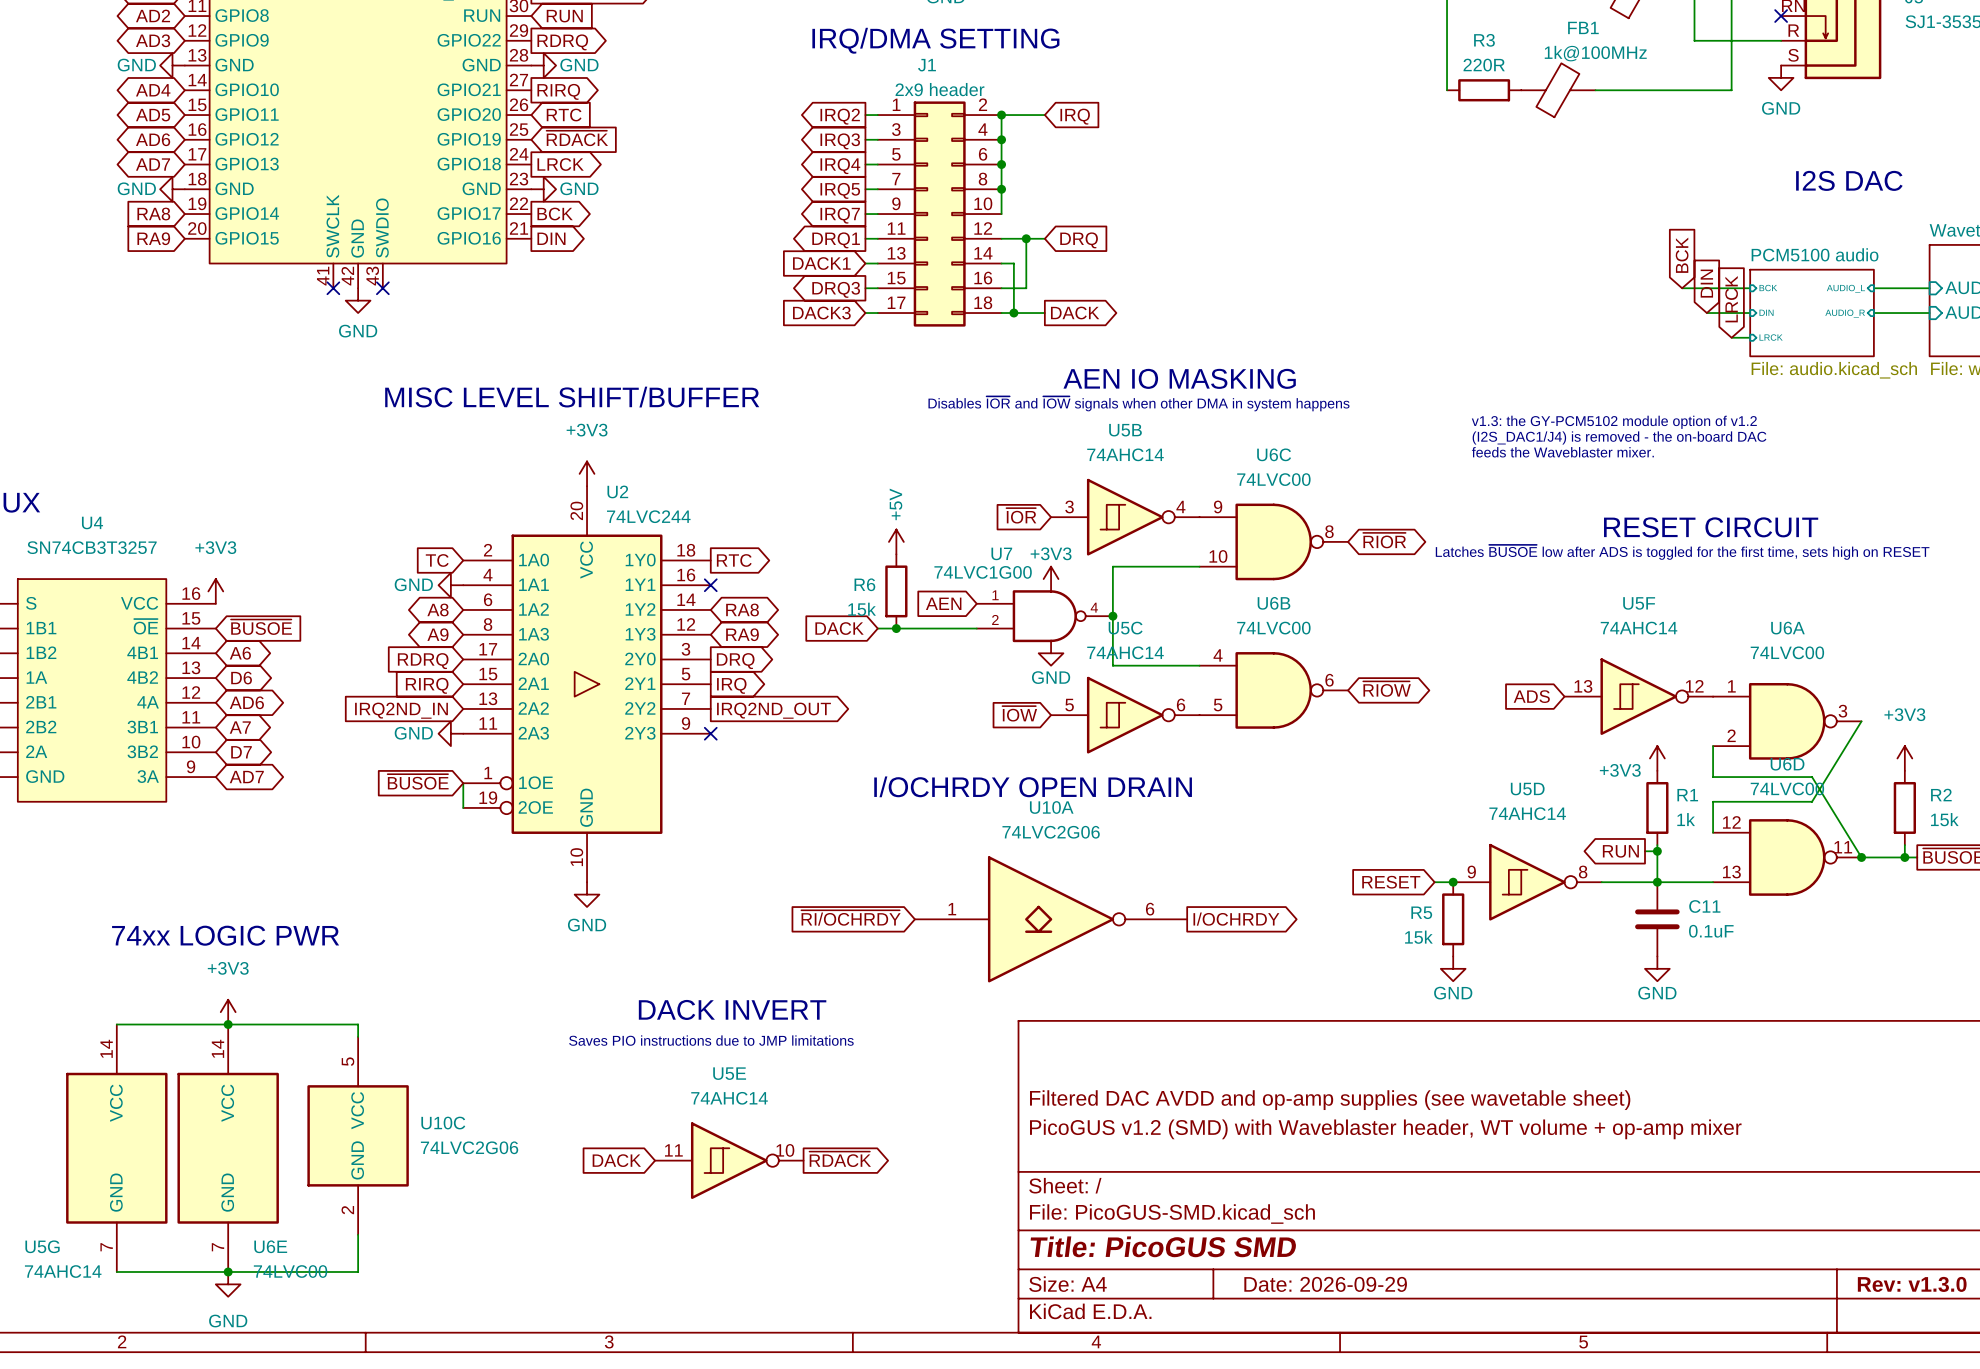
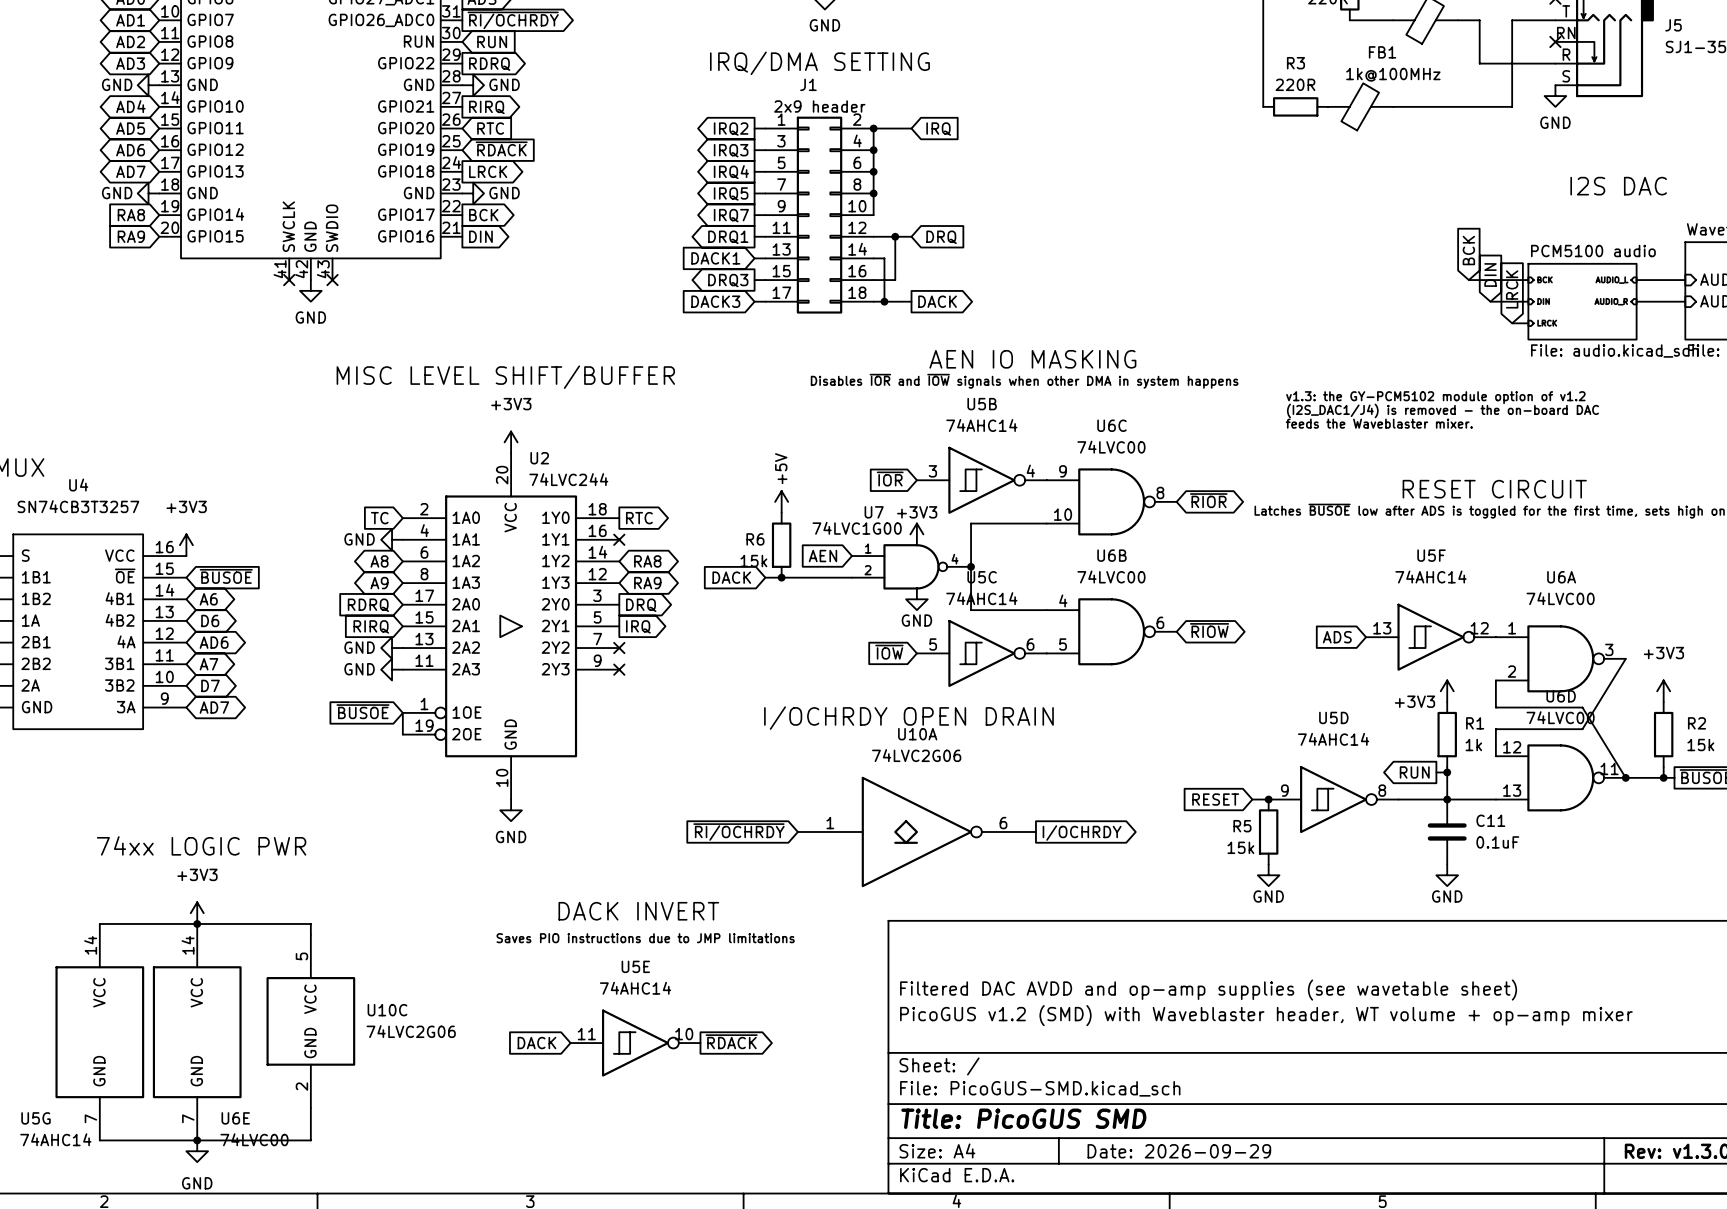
power symbol: none -> GND (392, 648)
no-connect mark: none -> (619, 648)
global label: IRQ2ND_IN (401, 710) -> none
global label: IRQ2ND_OUT (773, 710) -> none

